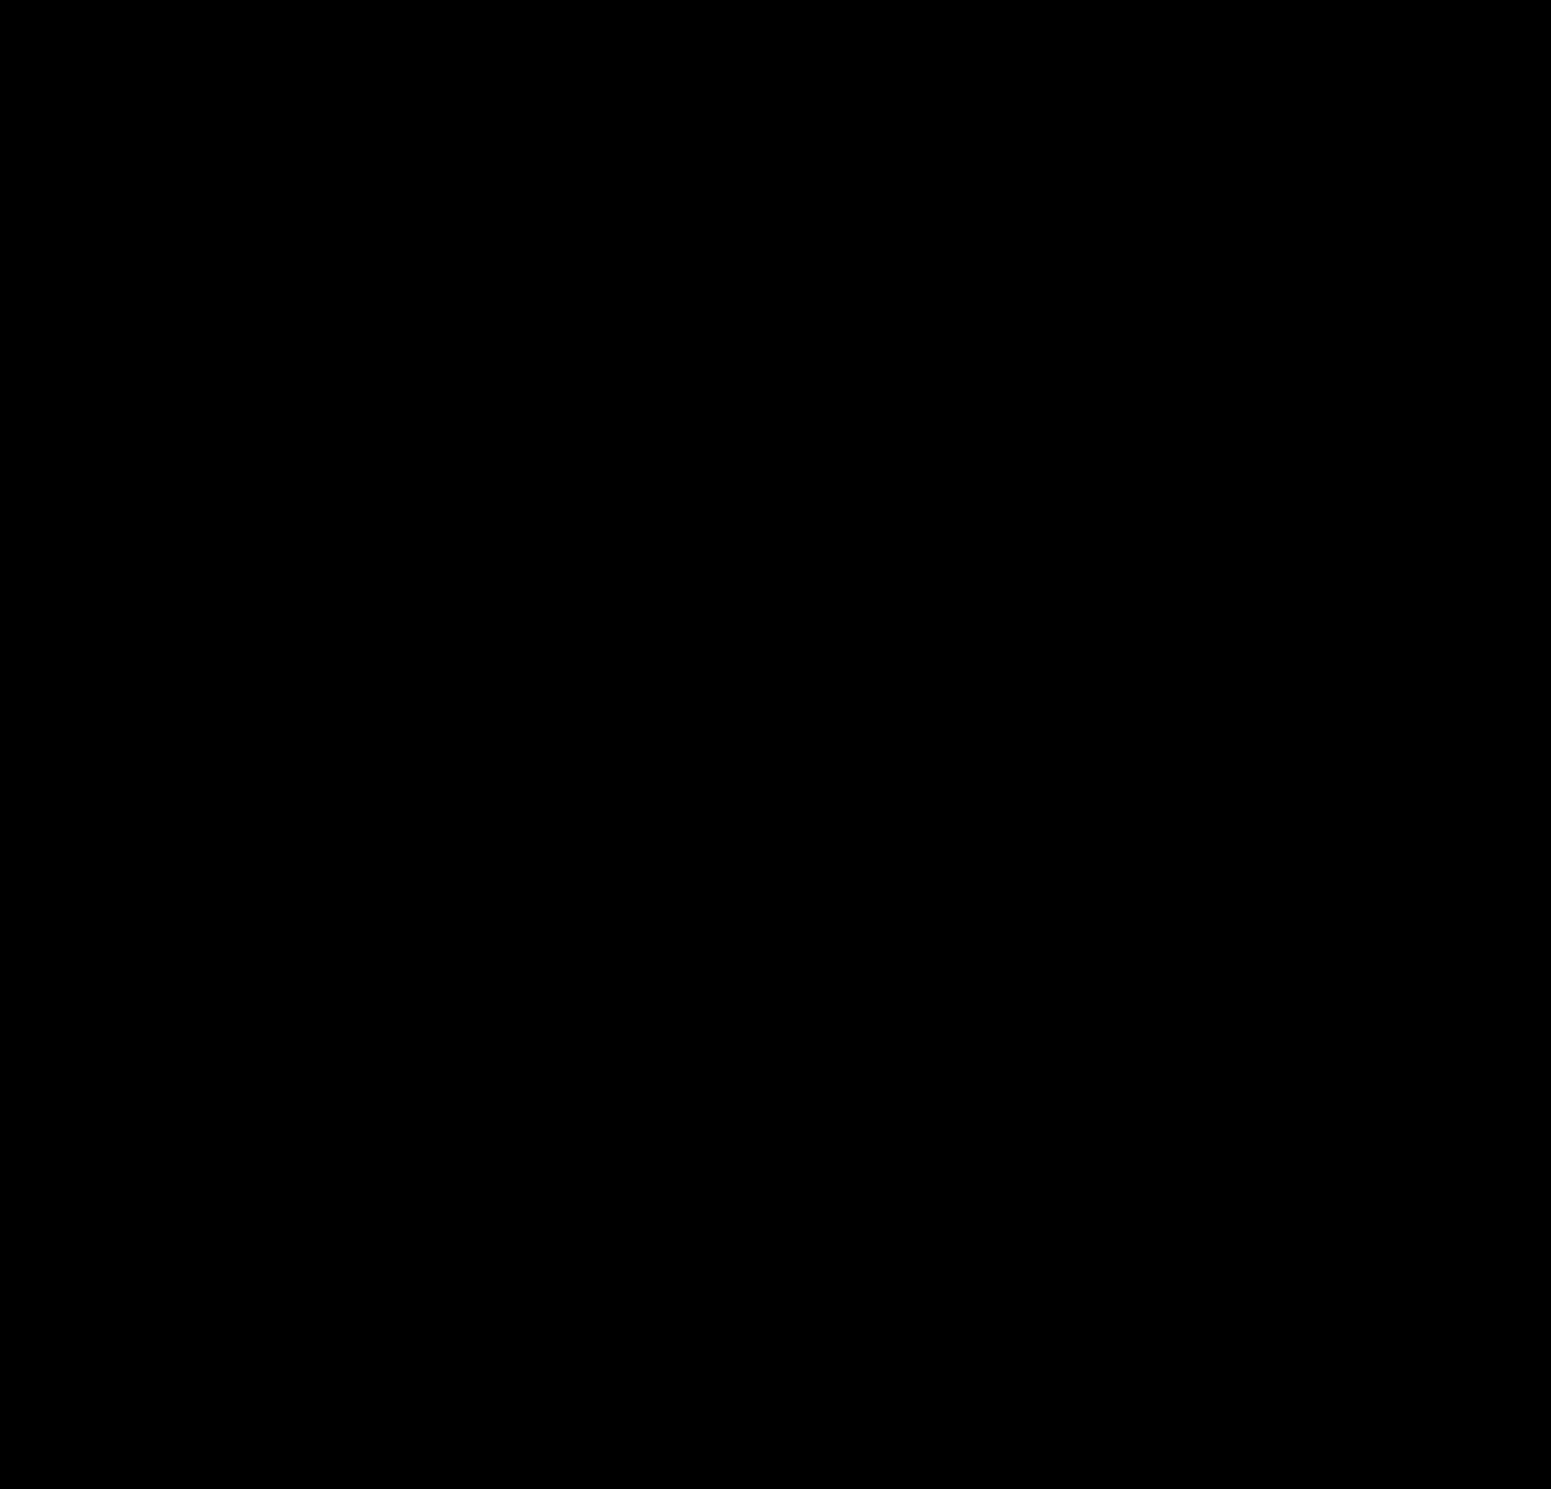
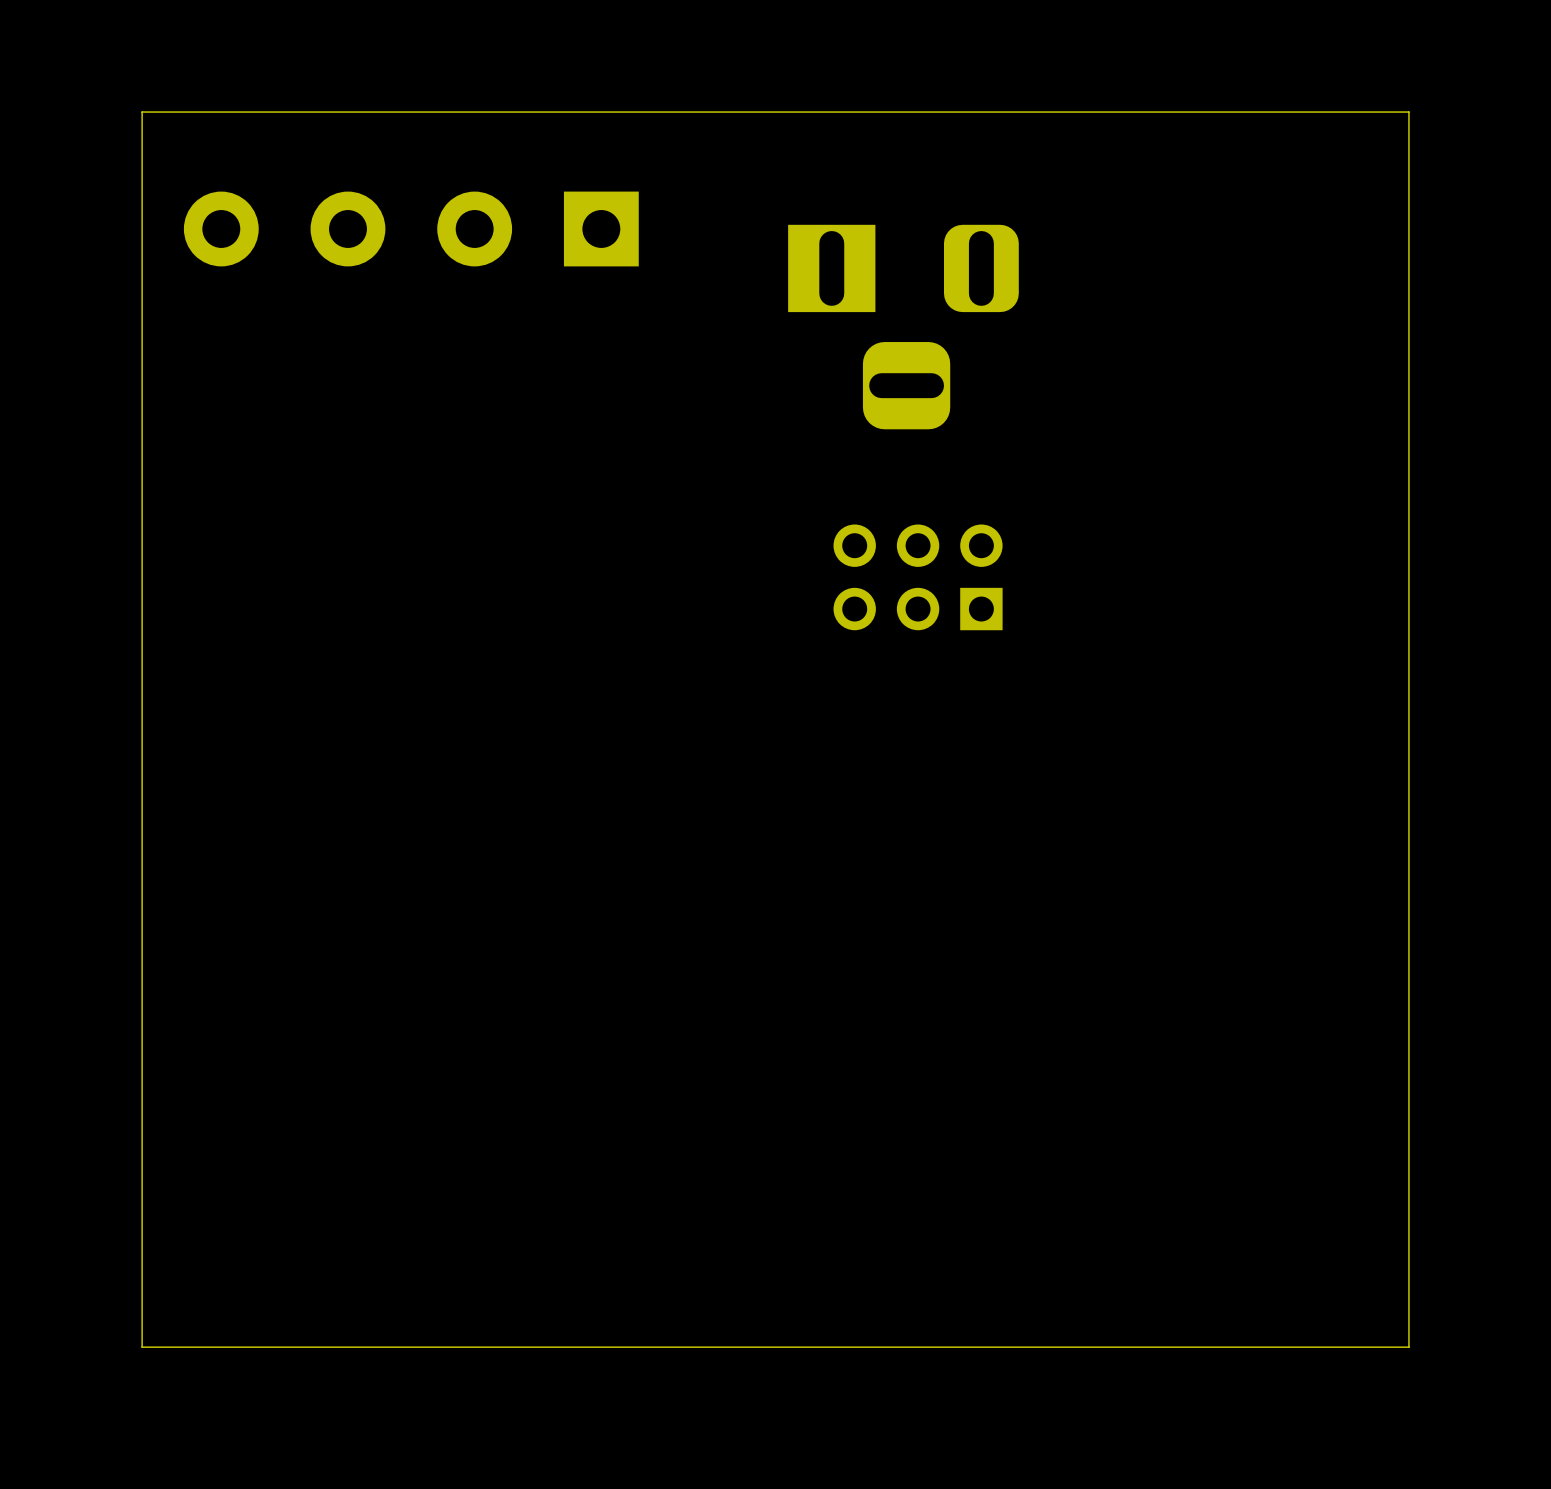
board edge: none -> (1408, 112) (142, 112) (142, 1347) (1408, 1347) (1408, 112)
part: none -> (411, 228)
part: none -> (903, 327)
part: none -> (918, 577)

